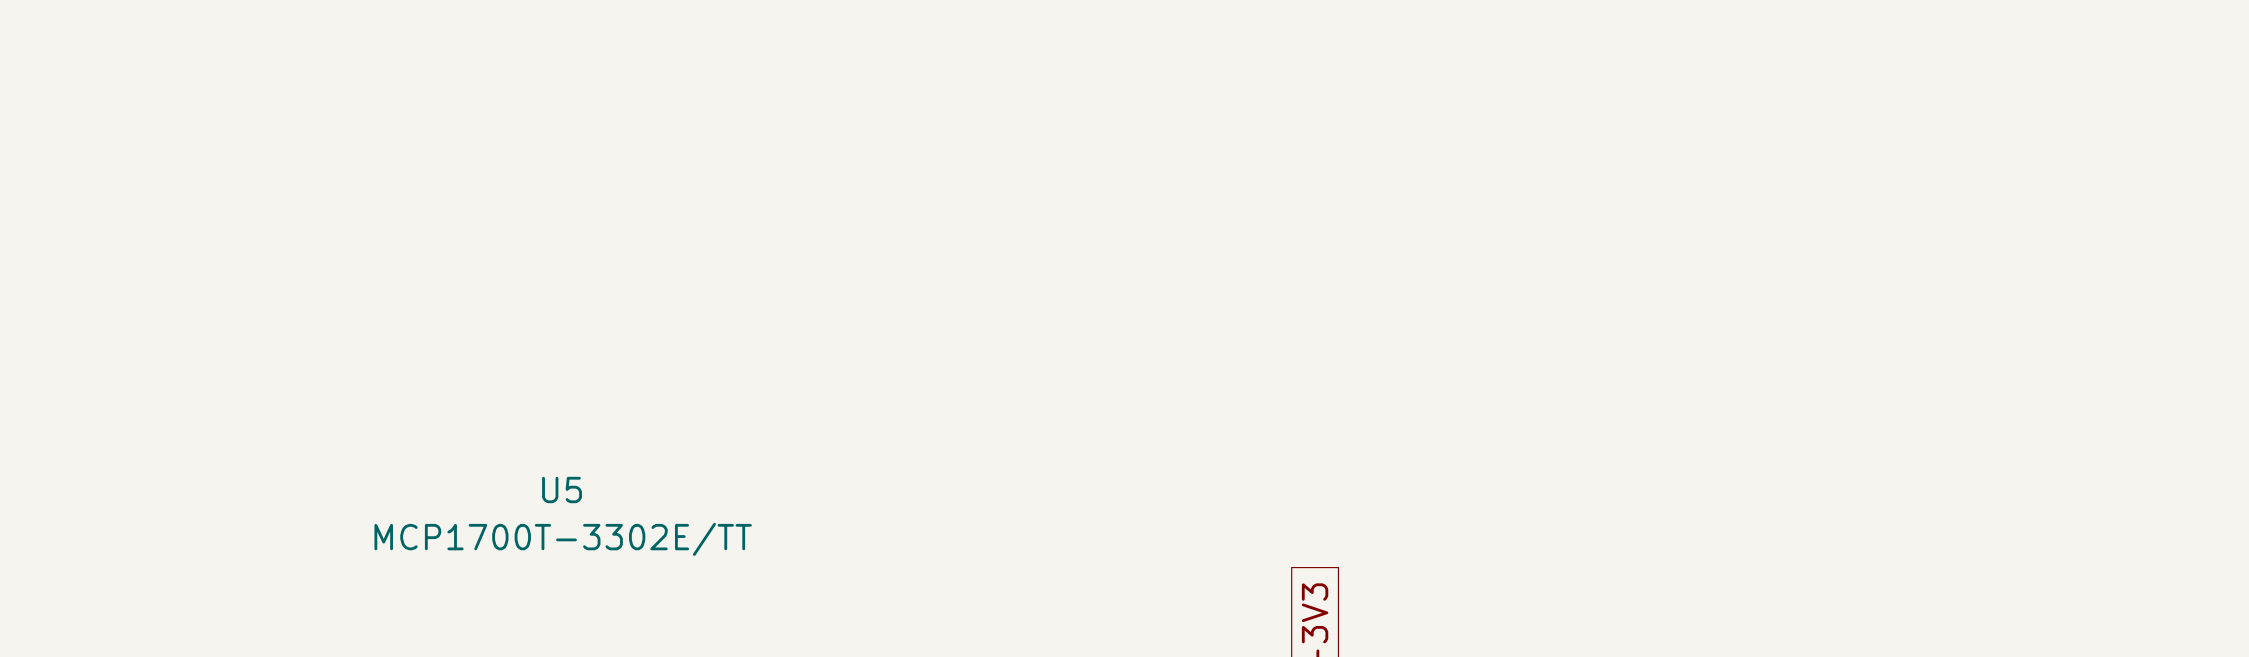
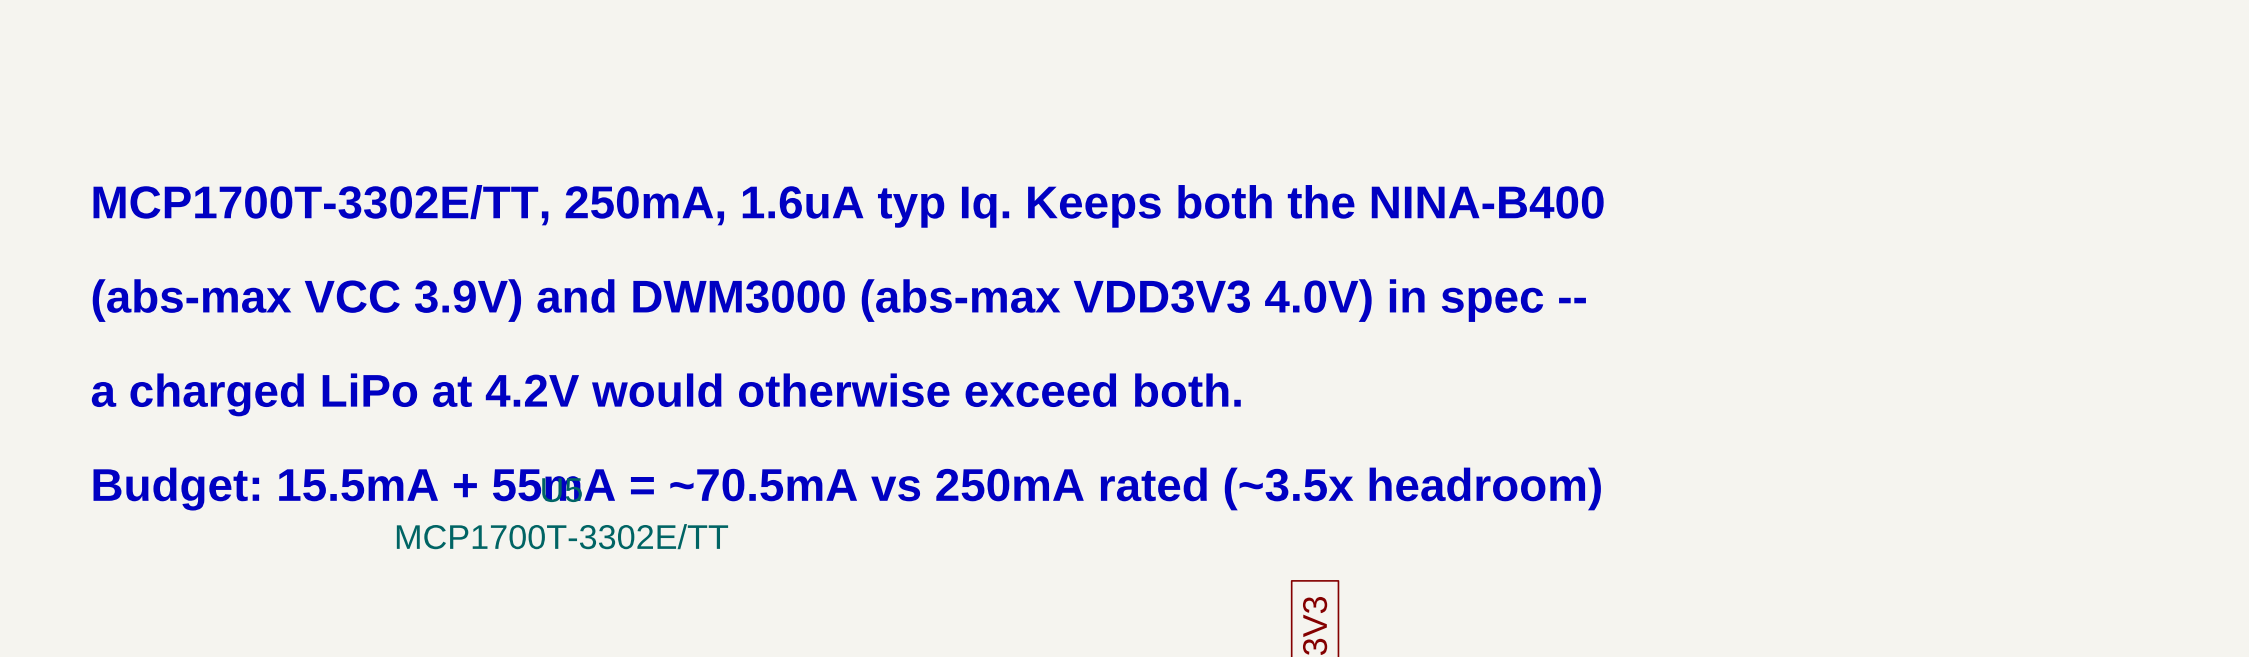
text: none -> MCP1700T-3302E/TT, 250mA, 1.6uA typ Iq. Keeps both the NINA-B400 (848, 206)
text: none -> (abs-max VCC 3.9V) and DWM3000 (abs-max VDD3V3 4.0V) in spec -- (839, 300)
text: none -> a charged LiPo at 4.2V would otherwise exceed both. (666, 394)
text: none -> Budget: 15.5mA + 55mA = ~70.5mA vs 250mA rated (~3.5x headroom) (847, 489)

